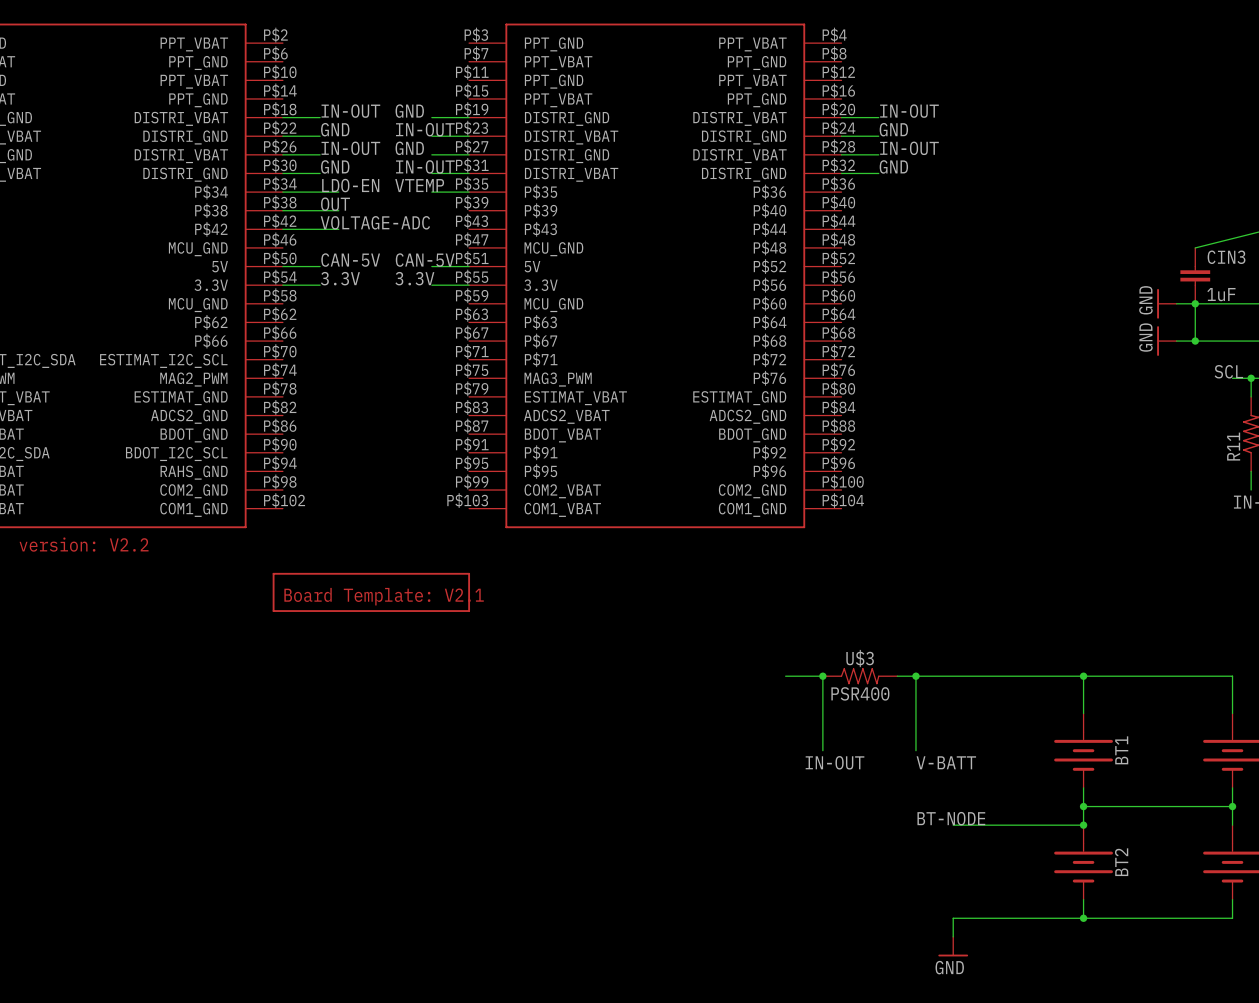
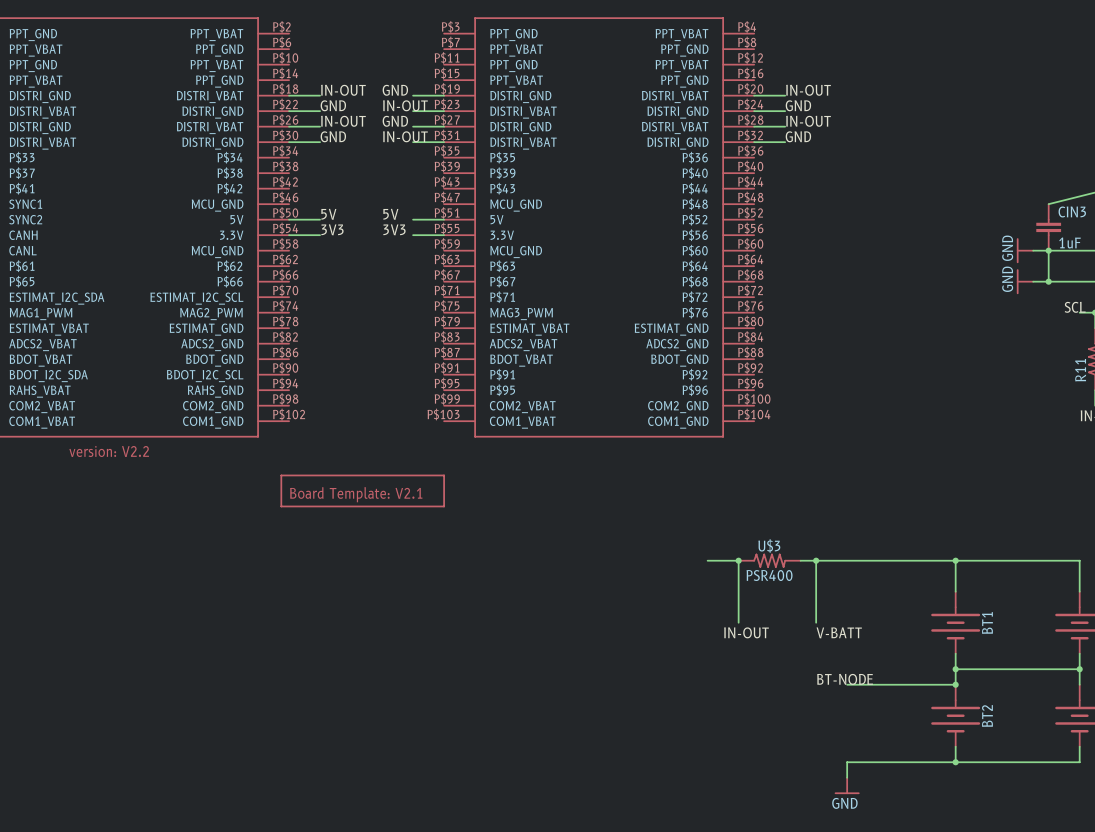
label: LDO-EN (350, 185) -> none
label: VTEMP (419, 185) -> none
wire: (282, 192) (338, 192) -> none
wire: (431, 192) (469, 192) -> none
label: OUT (335, 204) -> none
wire: (282, 210) (338, 210) -> none
label: VOLTAGE-ADC (375, 222) -> none
wire: (282, 229) (338, 229) -> none
label: CAN-5V (350, 260) -> 5V (328, 214)
label: CAN-5V (425, 260) -> 5V (390, 214)
label: 3.3V (340, 278) -> 3V3 (332, 229)
label: 3.3V (414, 278) -> 3V3 (394, 229)

